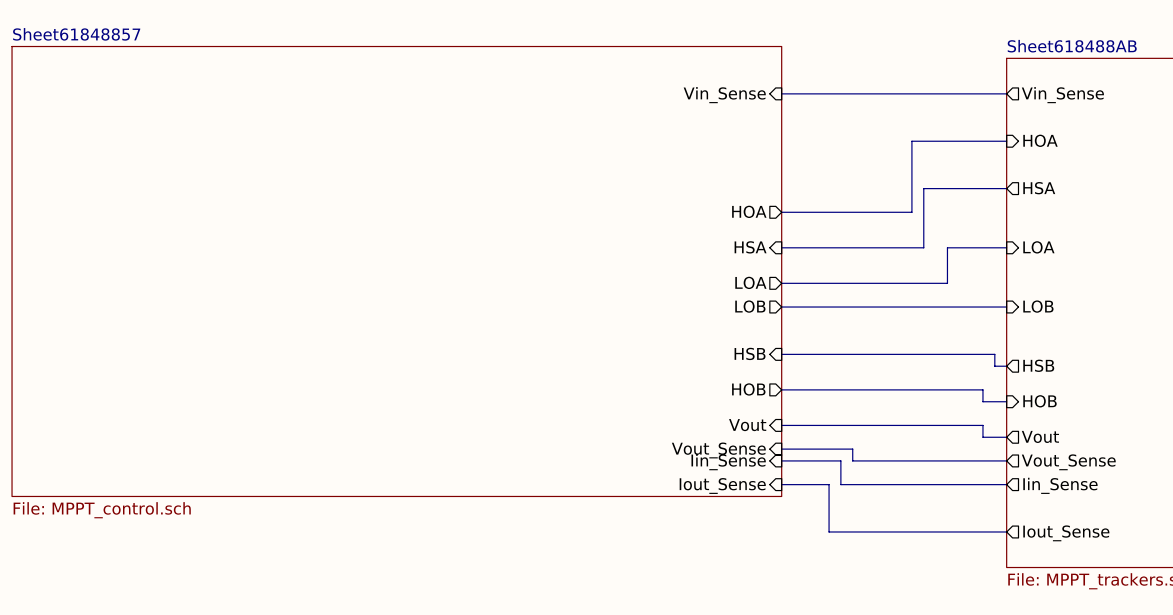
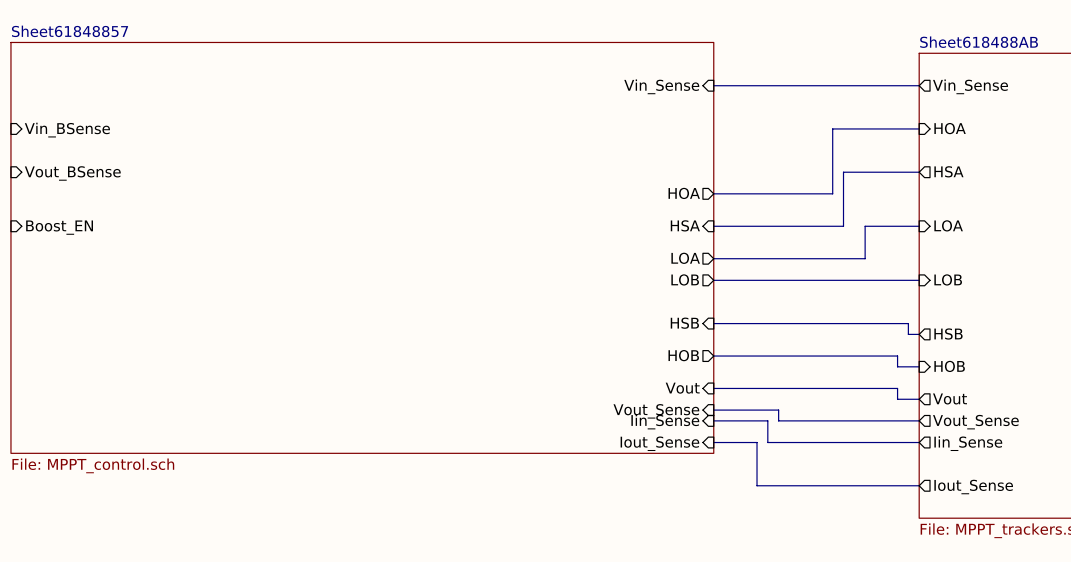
sheet pin: none -> Vin_BSense (67, 130)
sheet pin: none -> Vout_BSense (72, 173)
sheet pin: none -> Boost_EN (59, 227)

